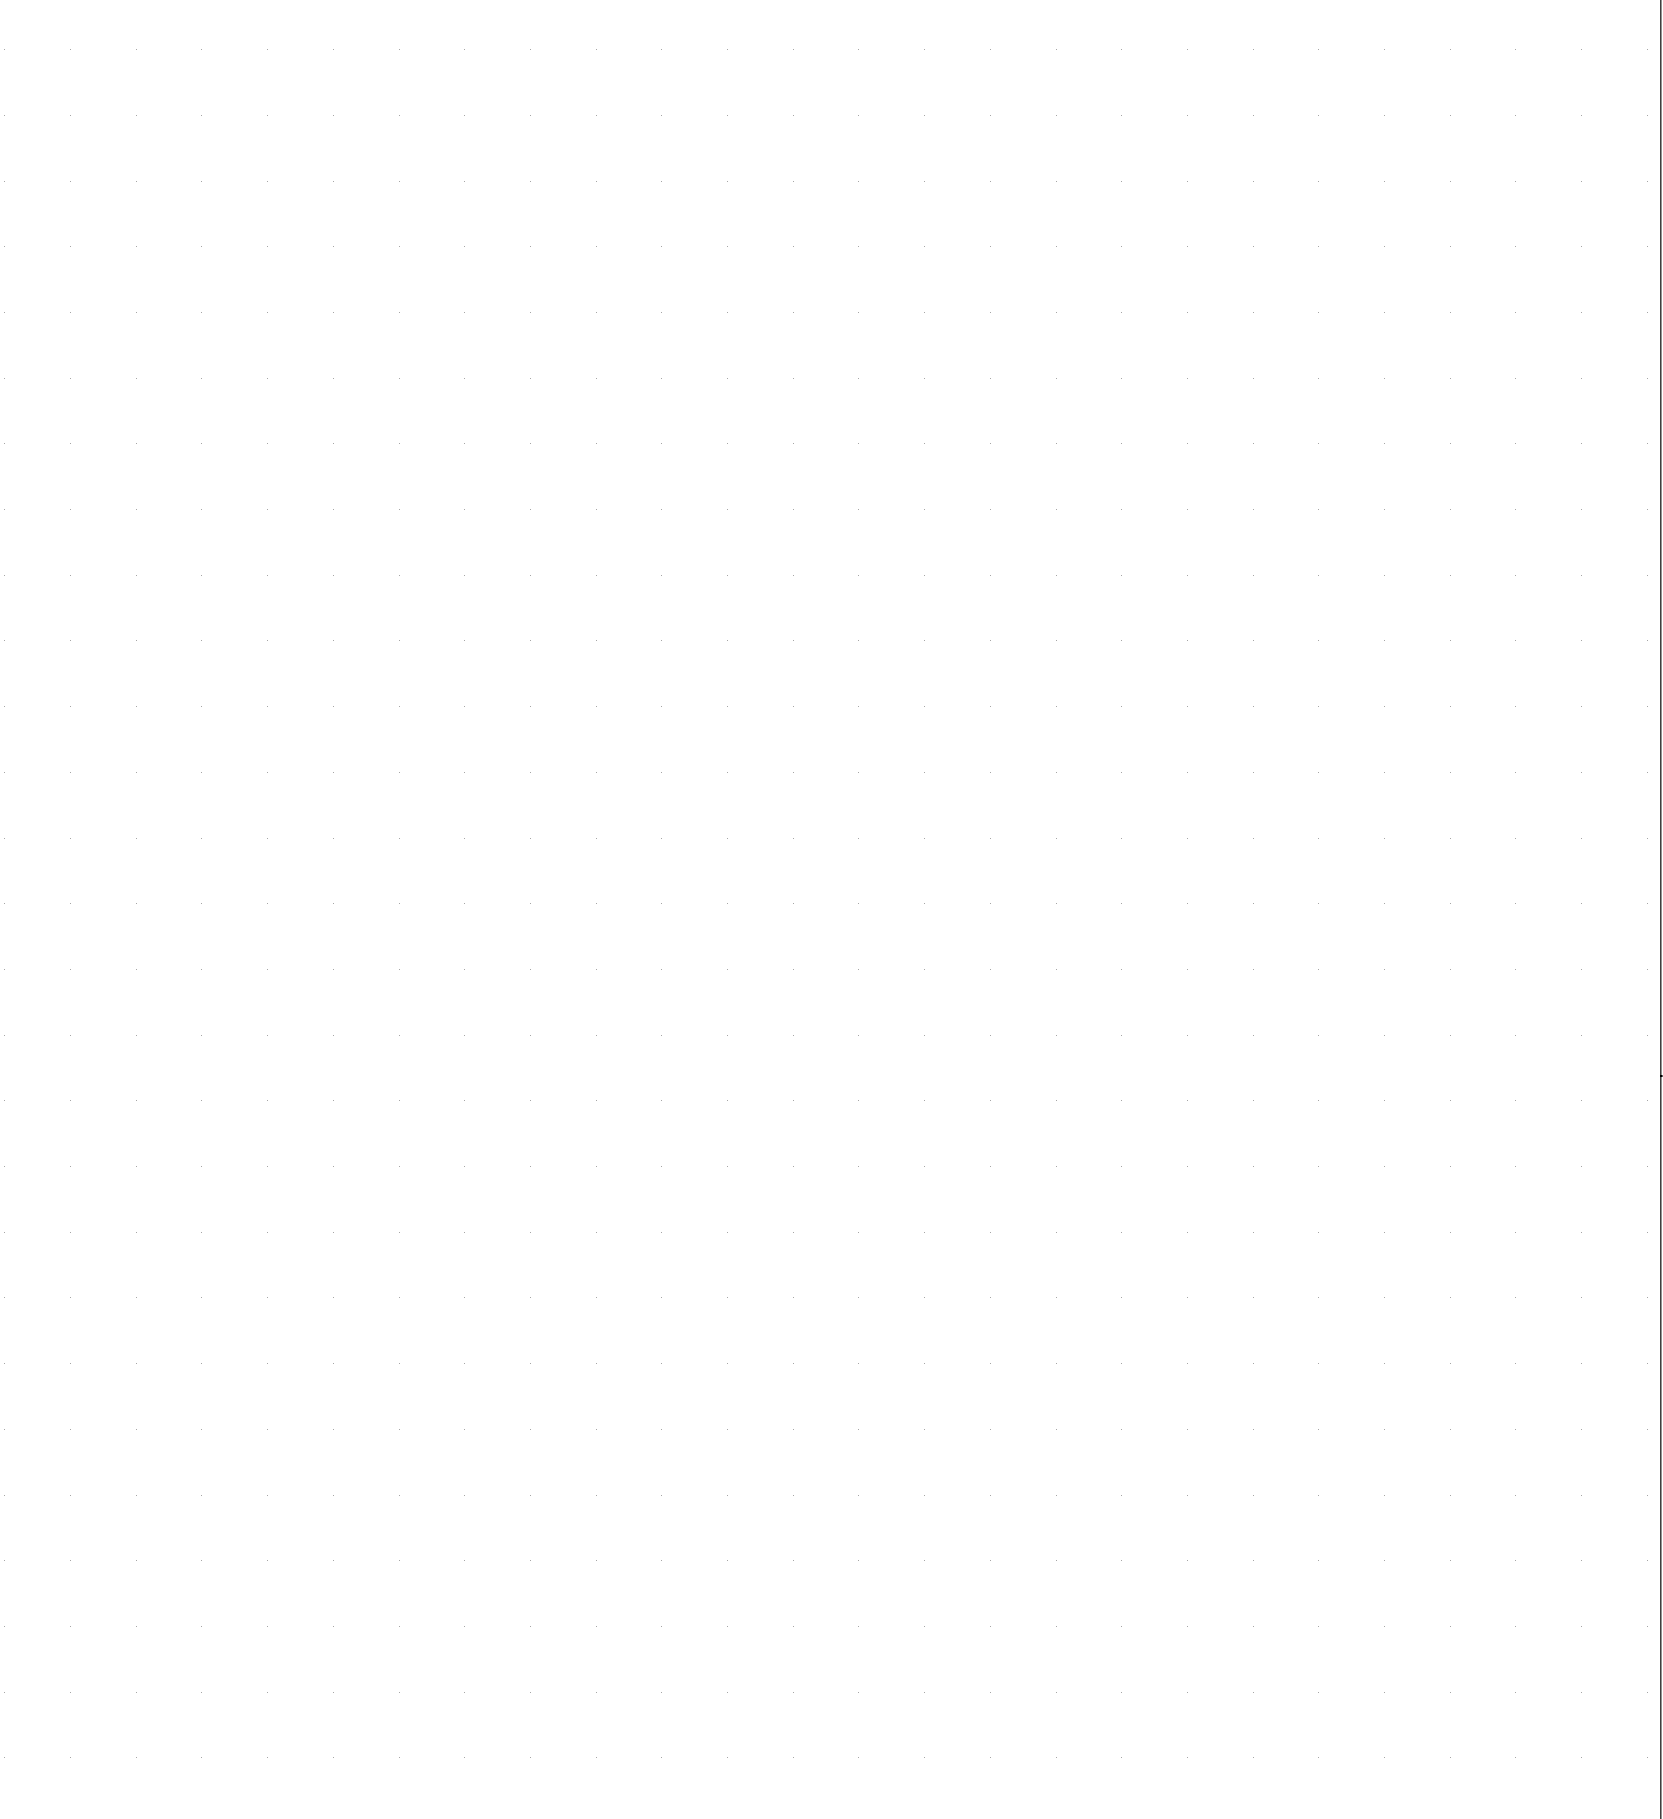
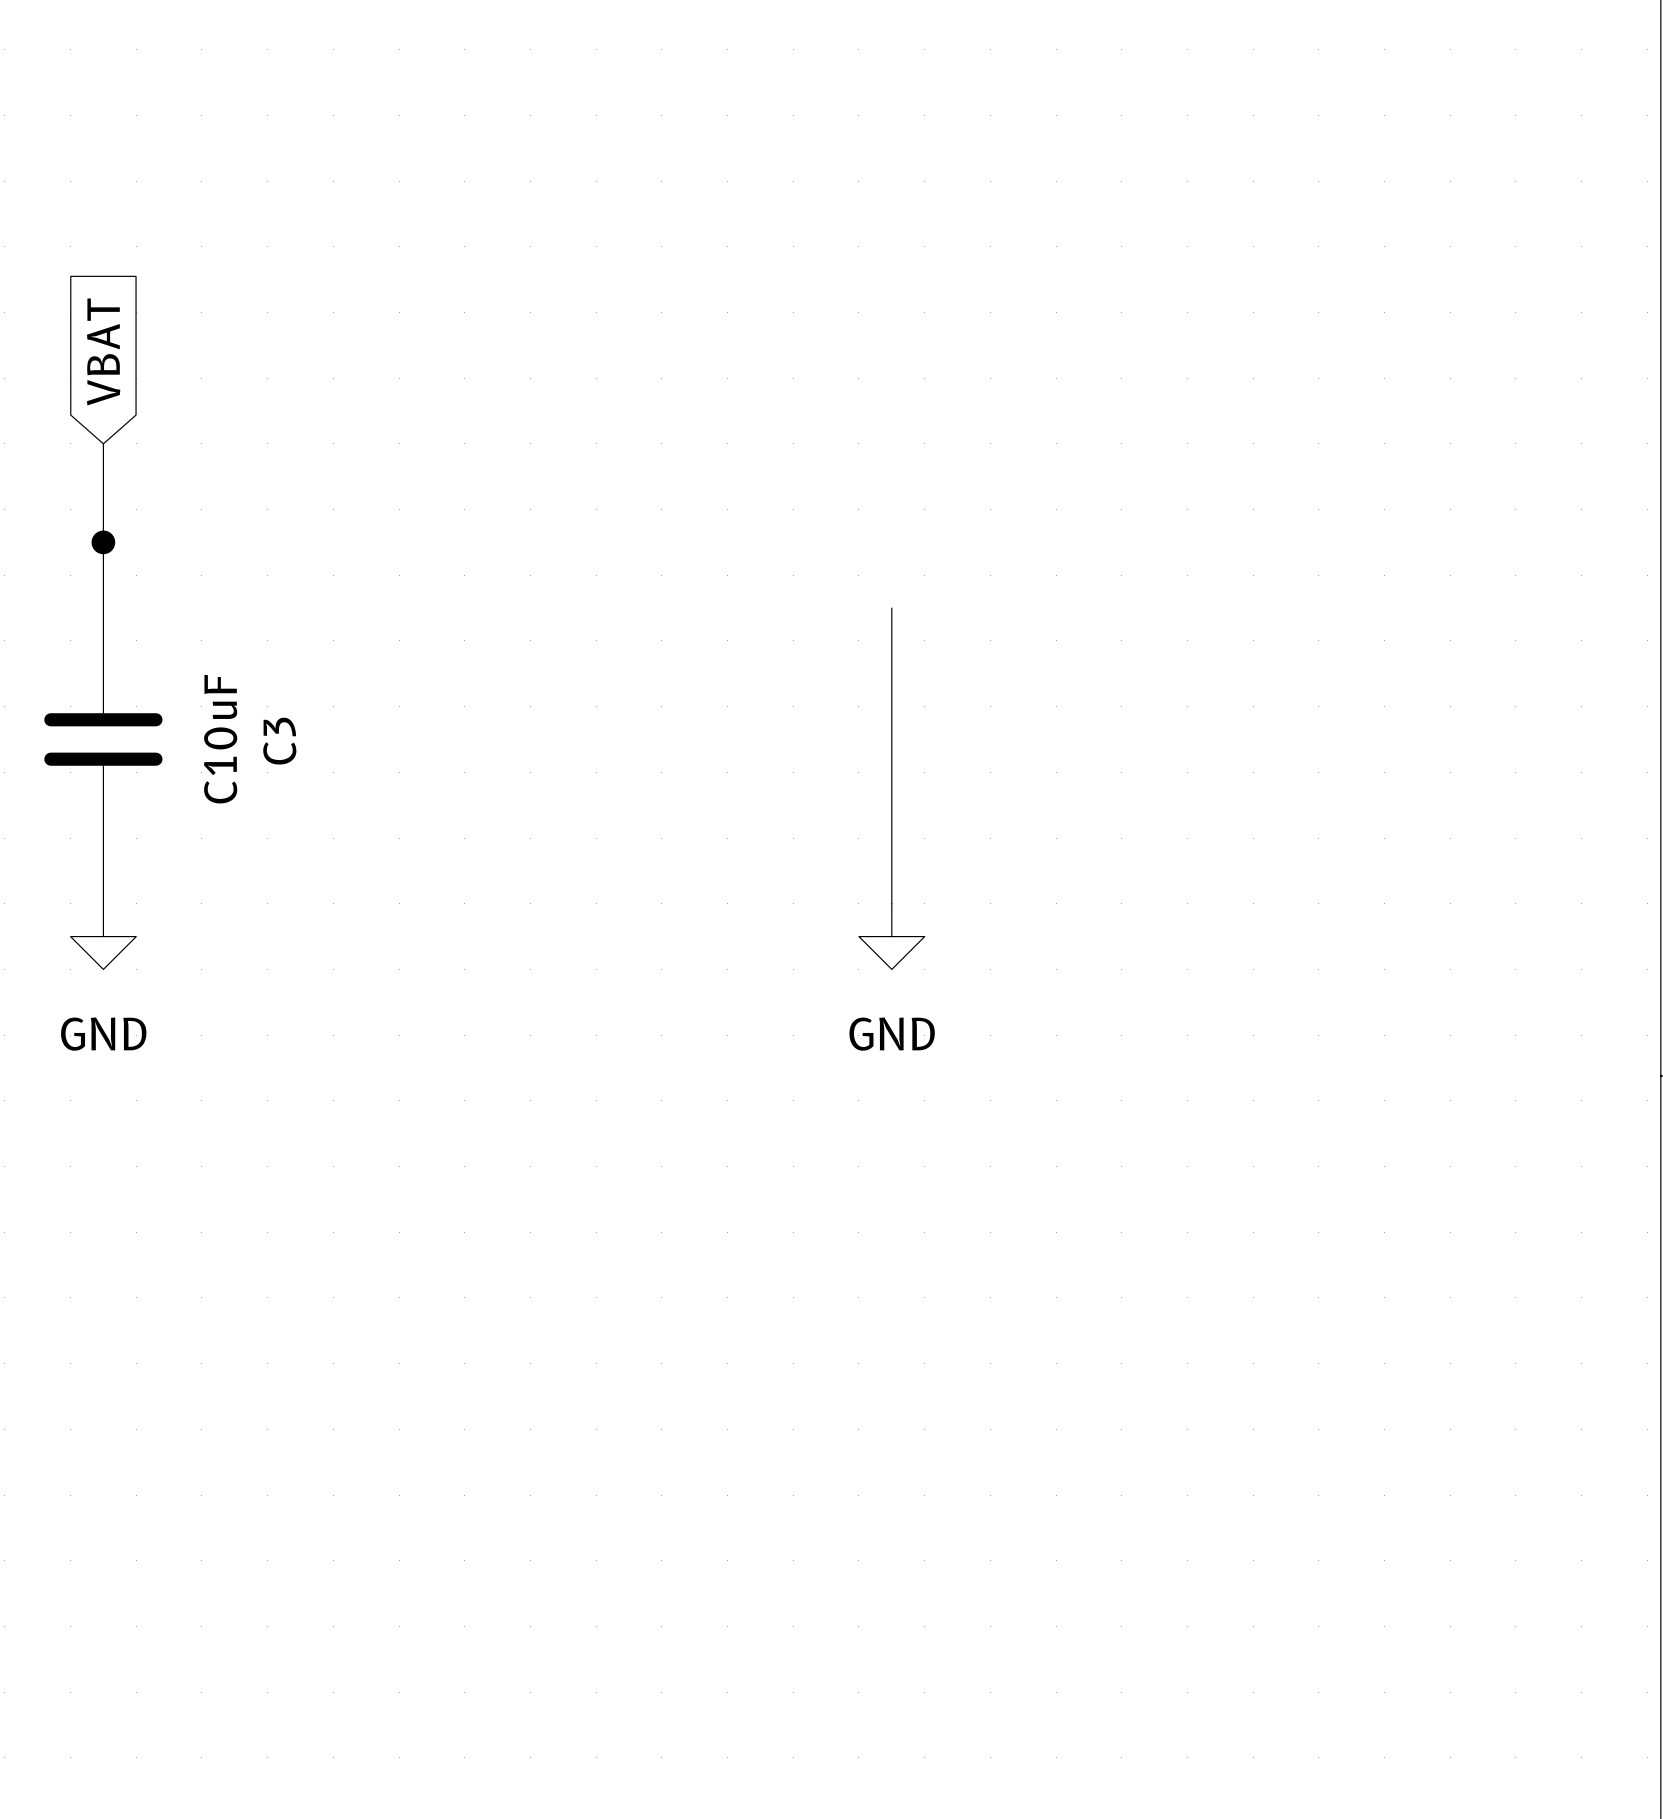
global label: none -> VBAT (103, 351)
wire: none -> (103, 443) (103, 640)
junction: none -> (103, 542)
wire: none -> (891, 608) (891, 903)
C3: none -> C10uF (103, 739)
wire: none -> (103, 838) (103, 903)
power symbol: none -> GND (103, 936)
power symbol: none -> GND (891, 936)

